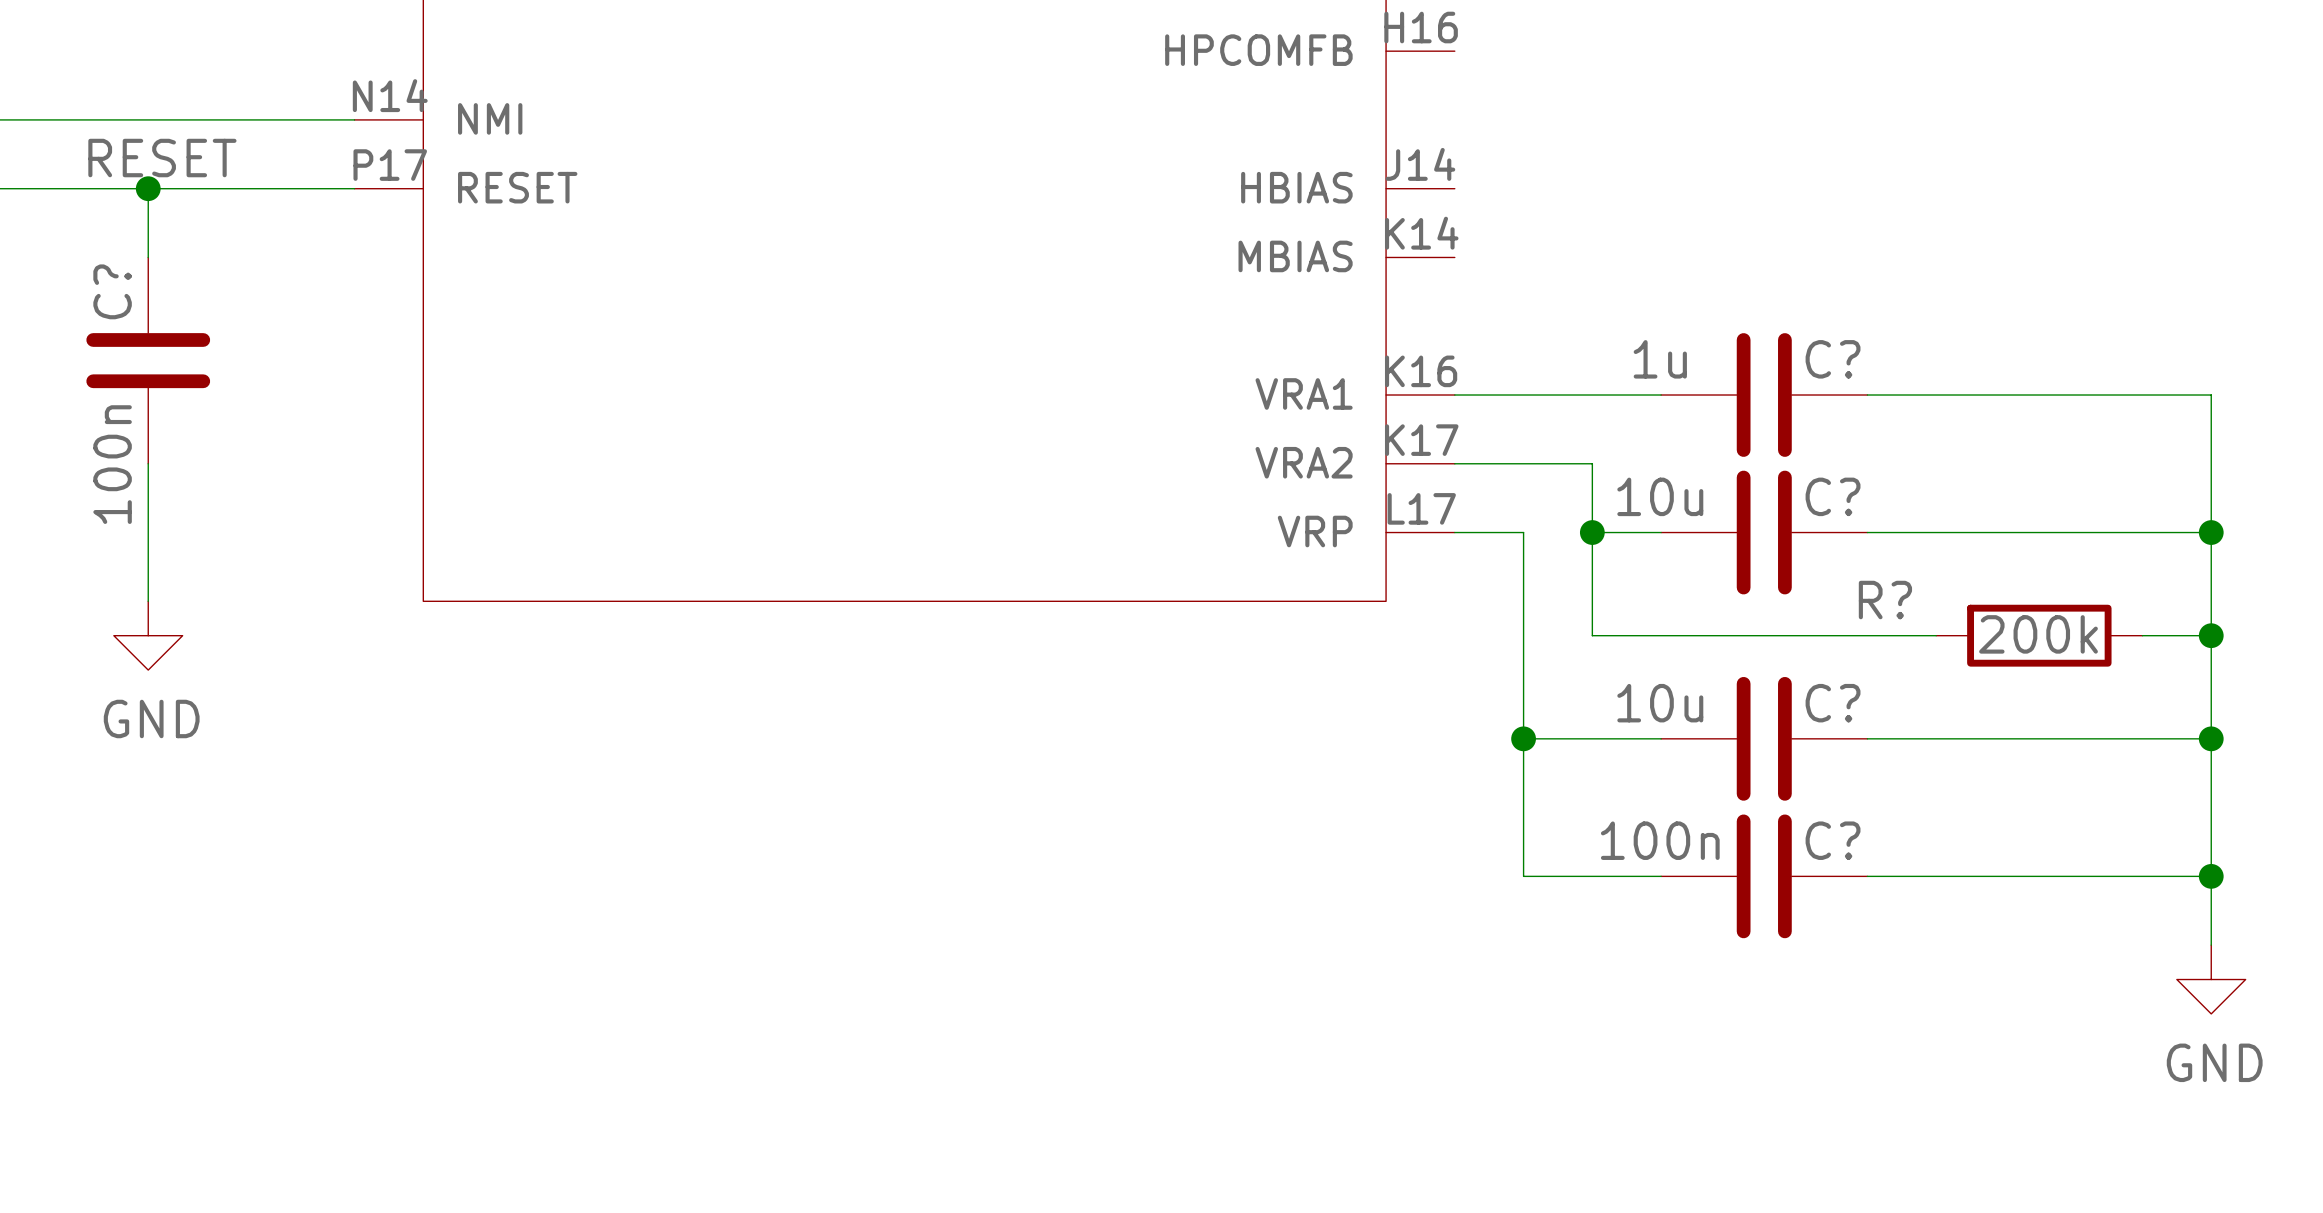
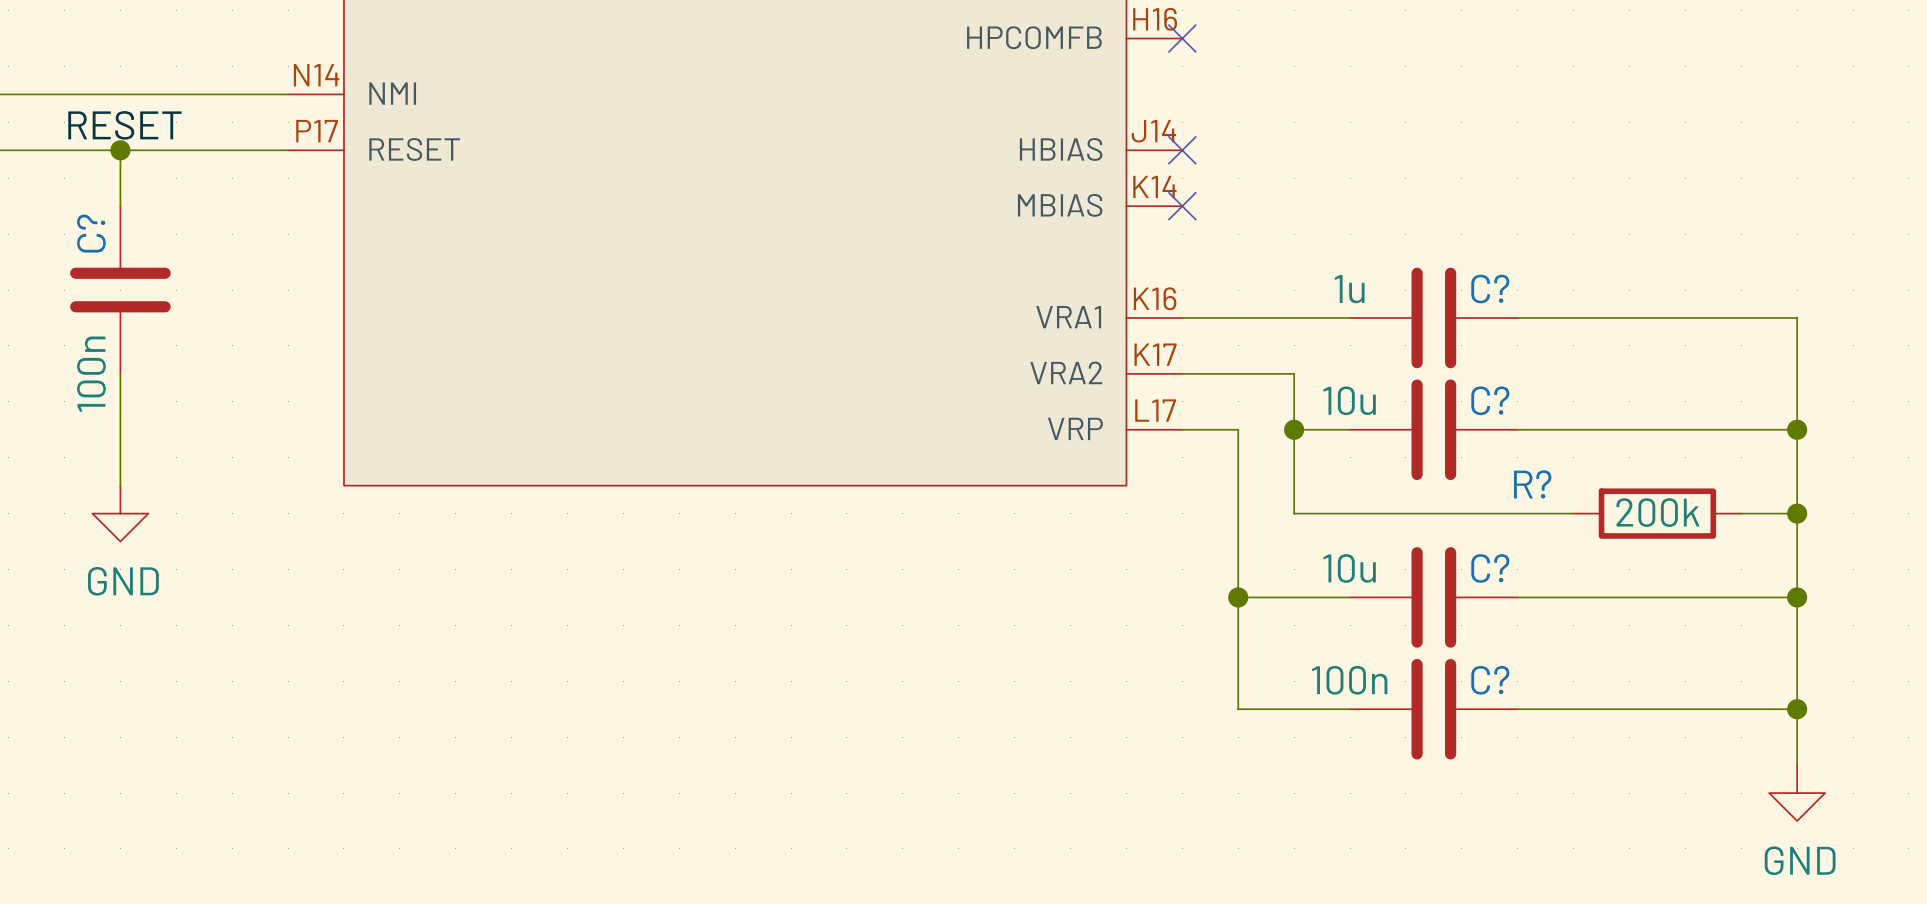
no-connect mark: none -> (1182, 38)
no-connect mark: none -> (1182, 150)
no-connect mark: none -> (1182, 206)

